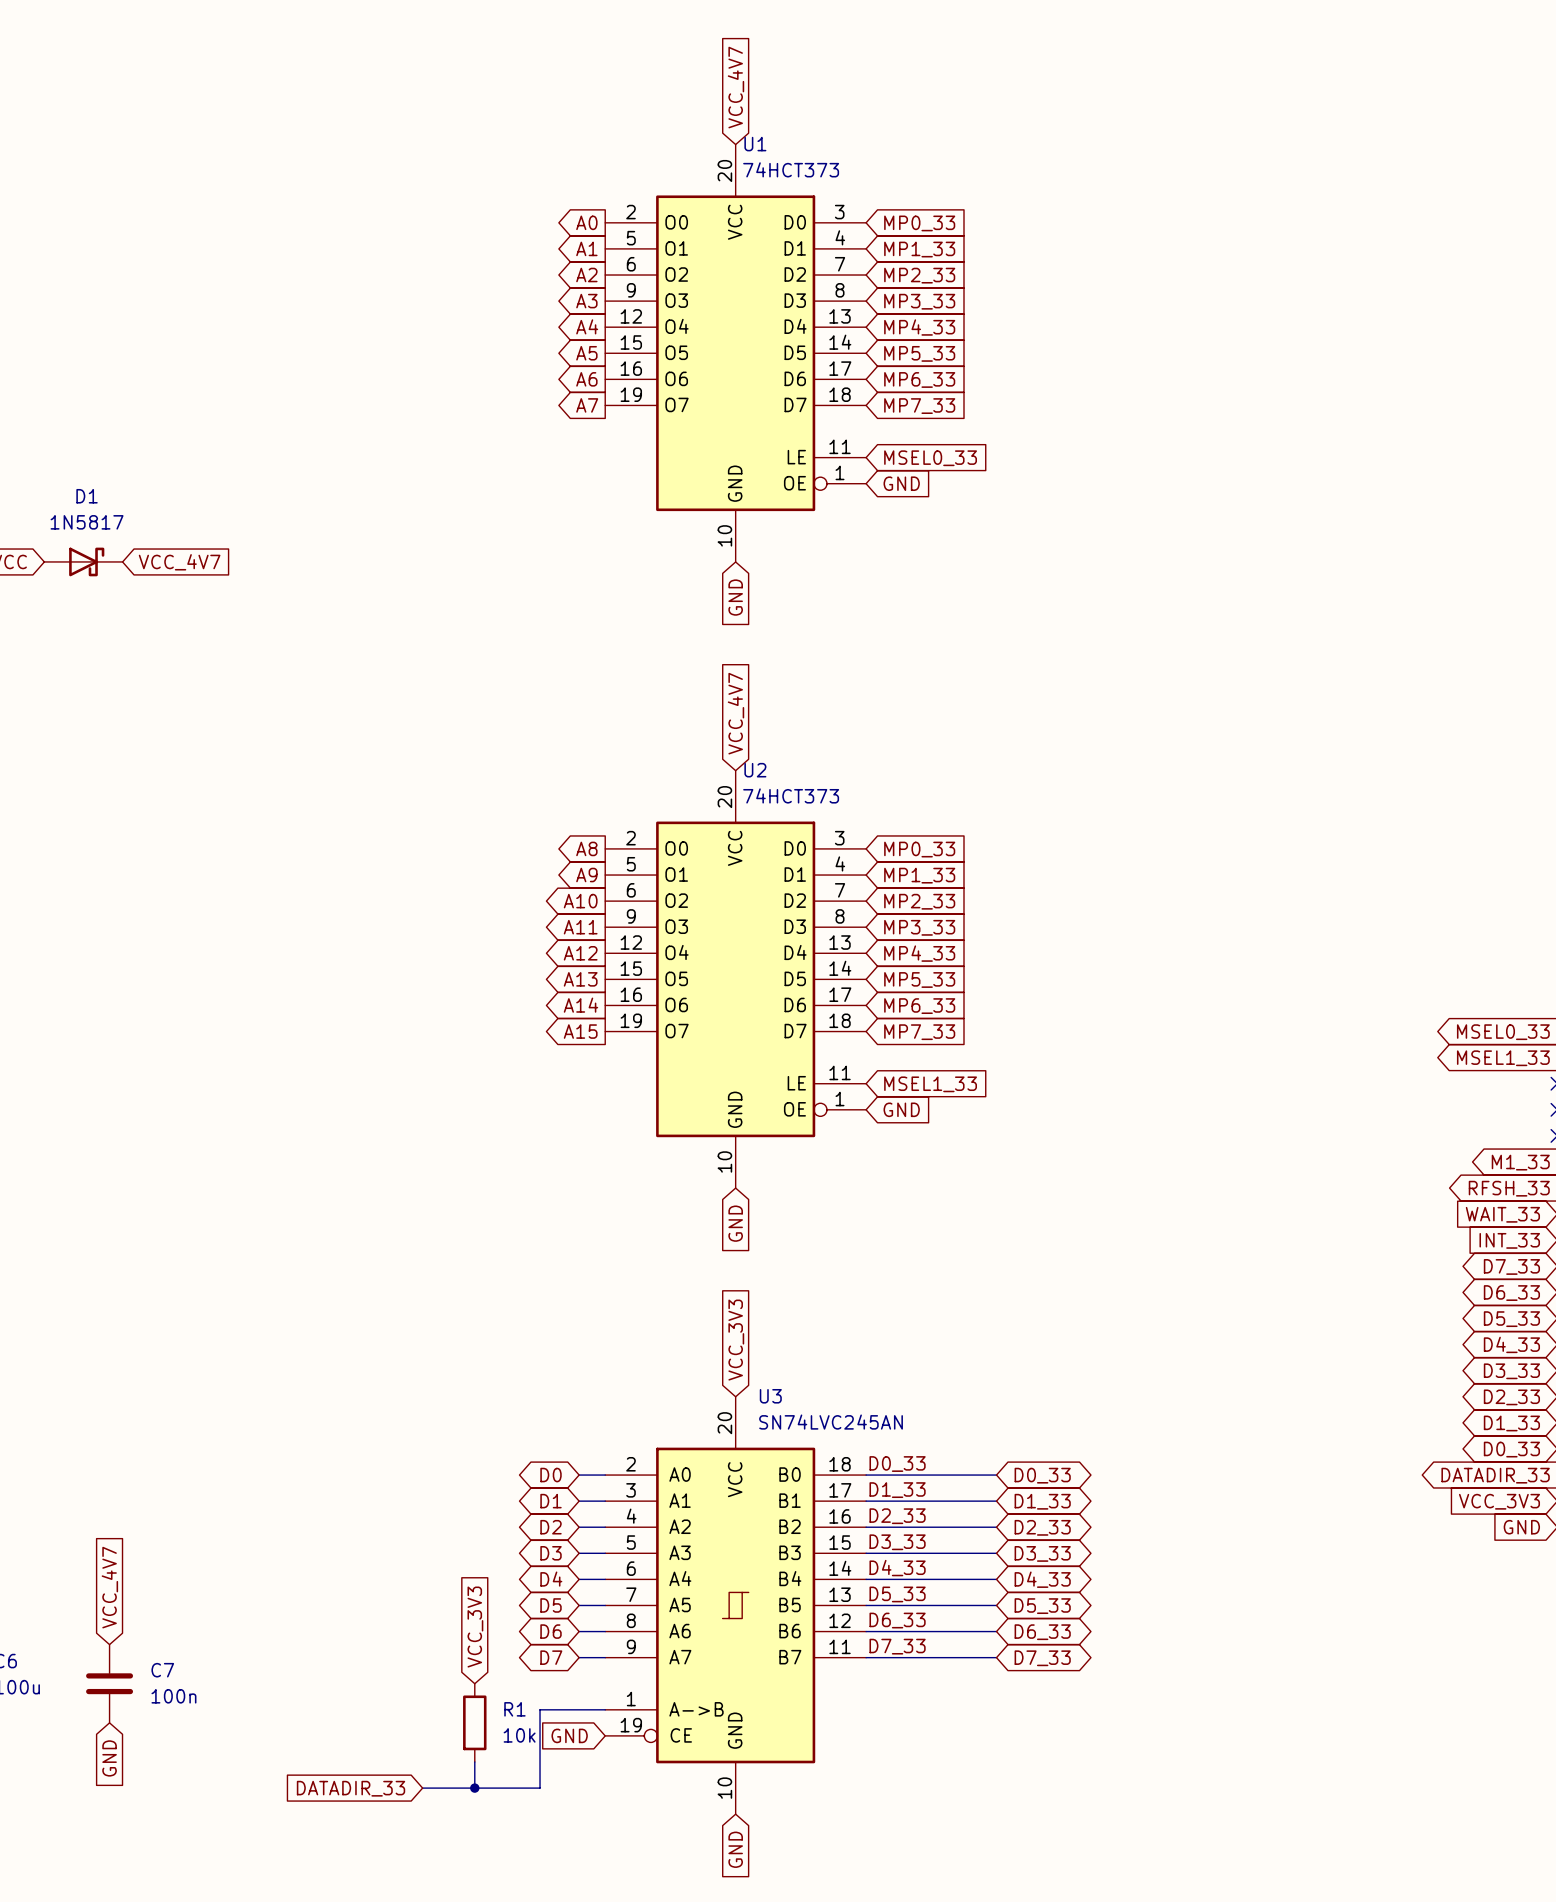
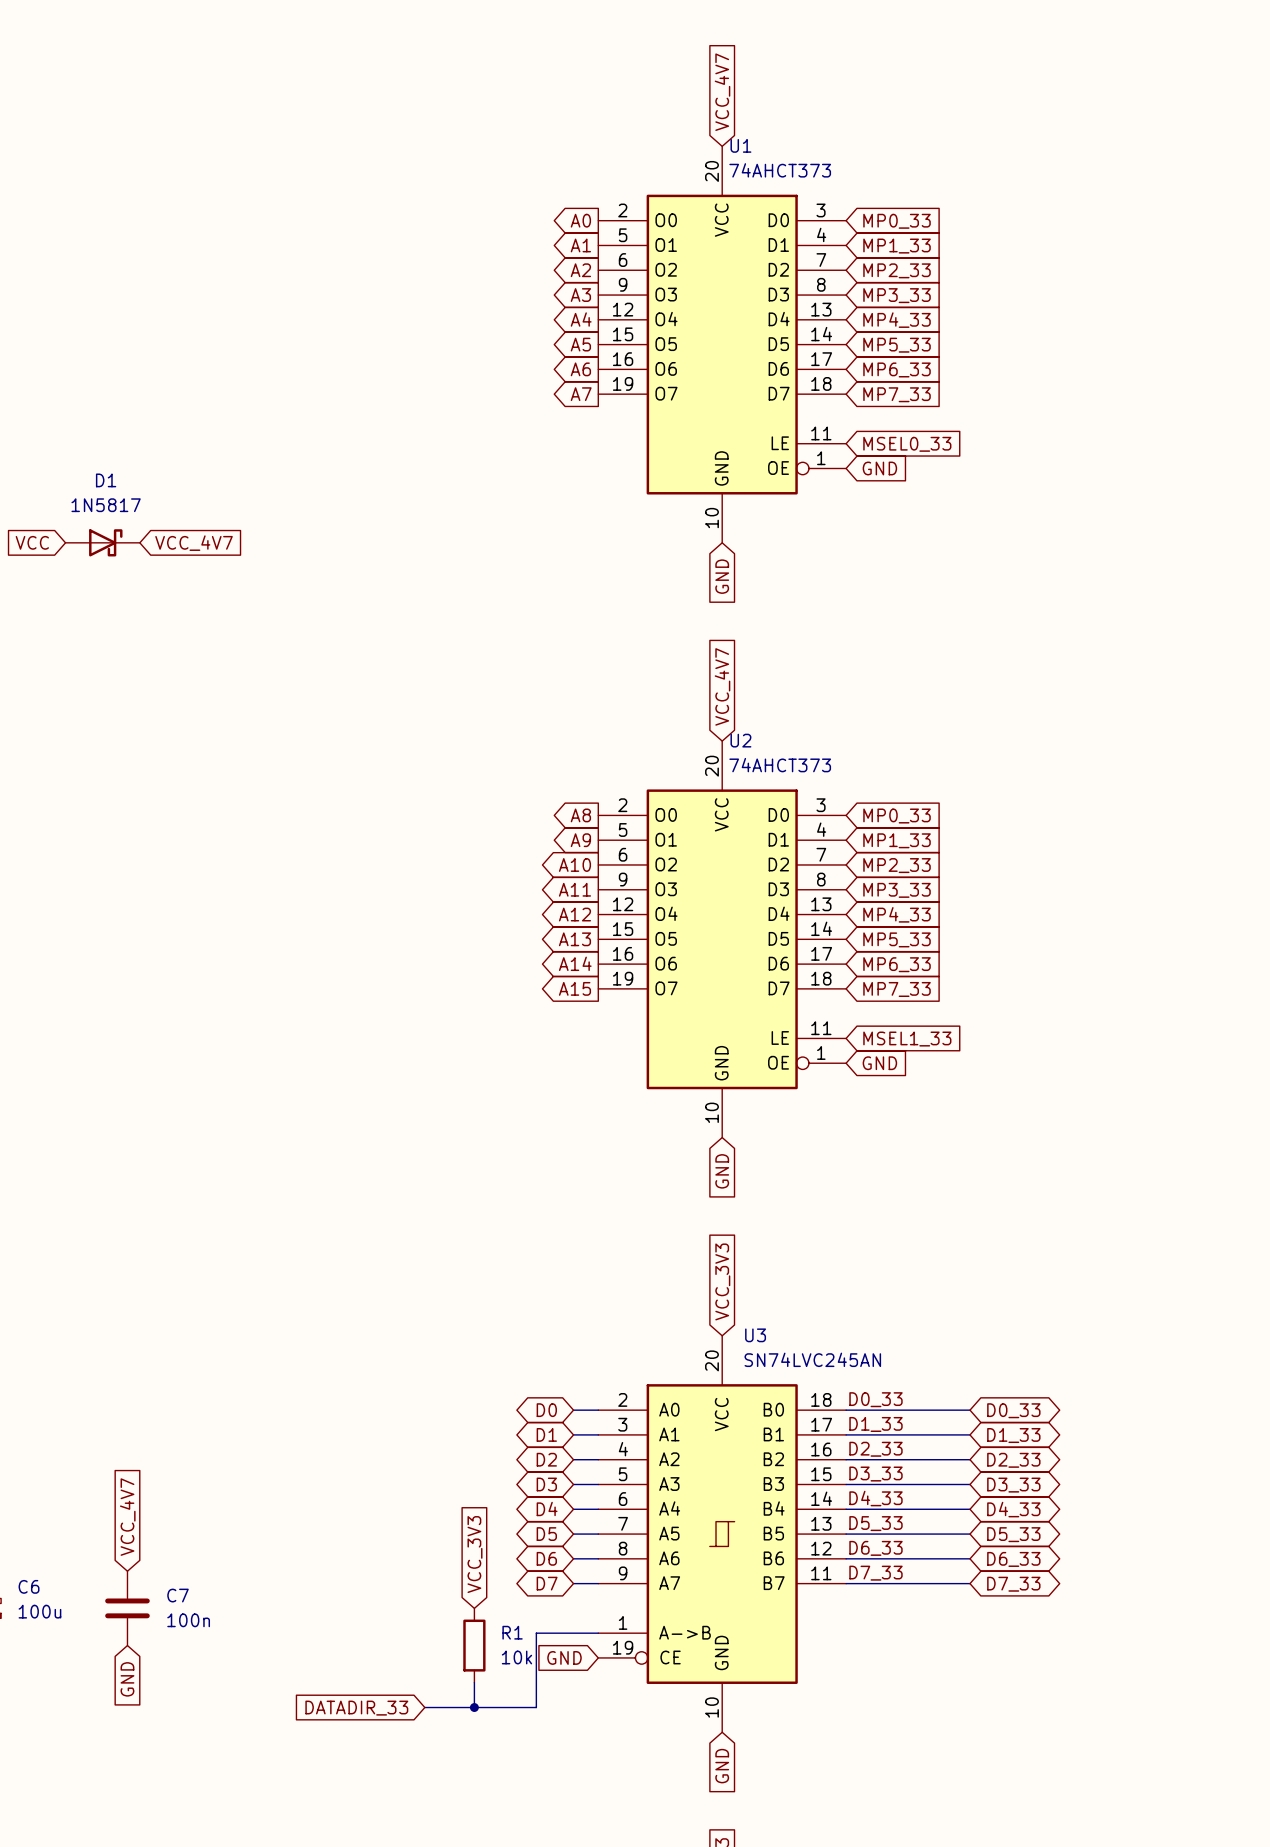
U1 value: 74HCT373 (791, 169) -> 74AHCT373 (780, 170)
U2 value: 74HCT373 (791, 795) -> 74AHCT373 (780, 765)

